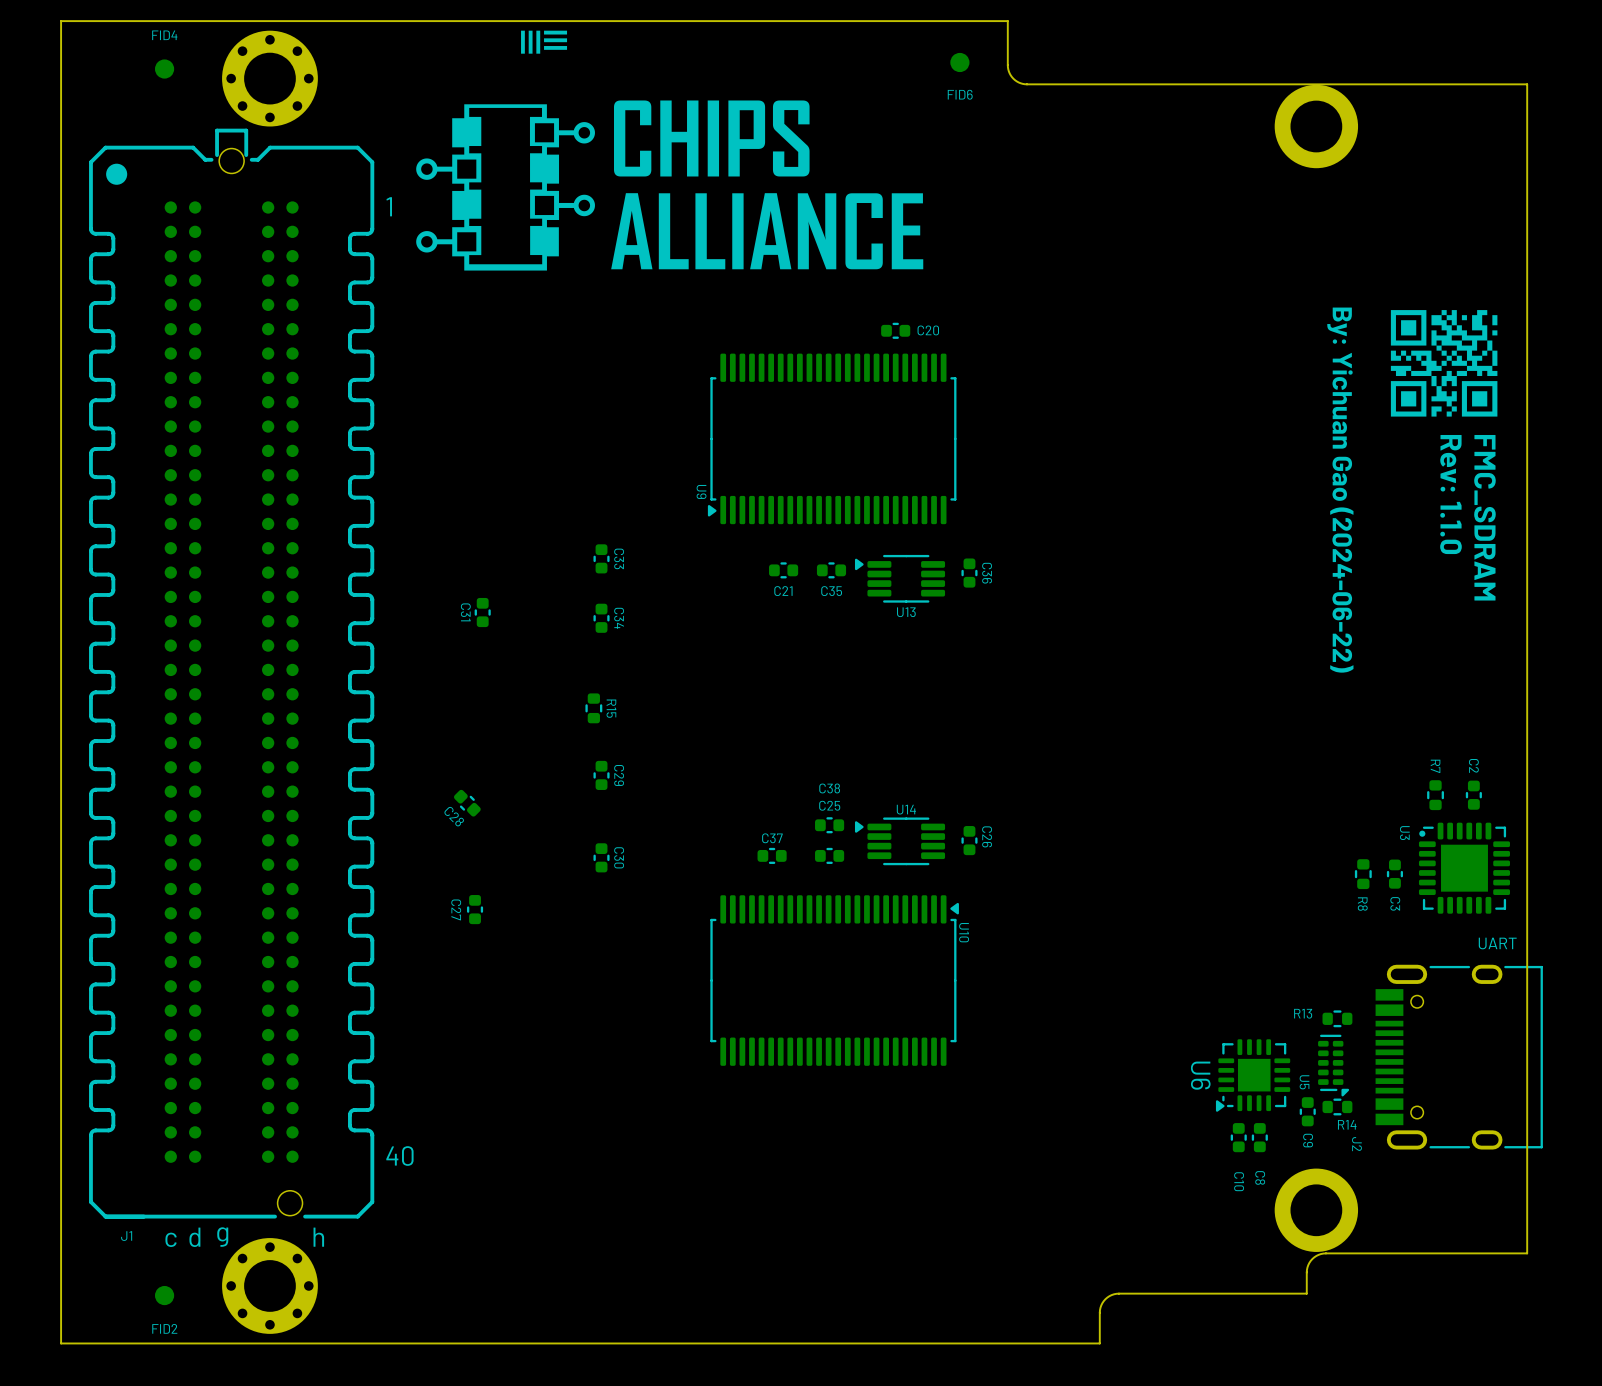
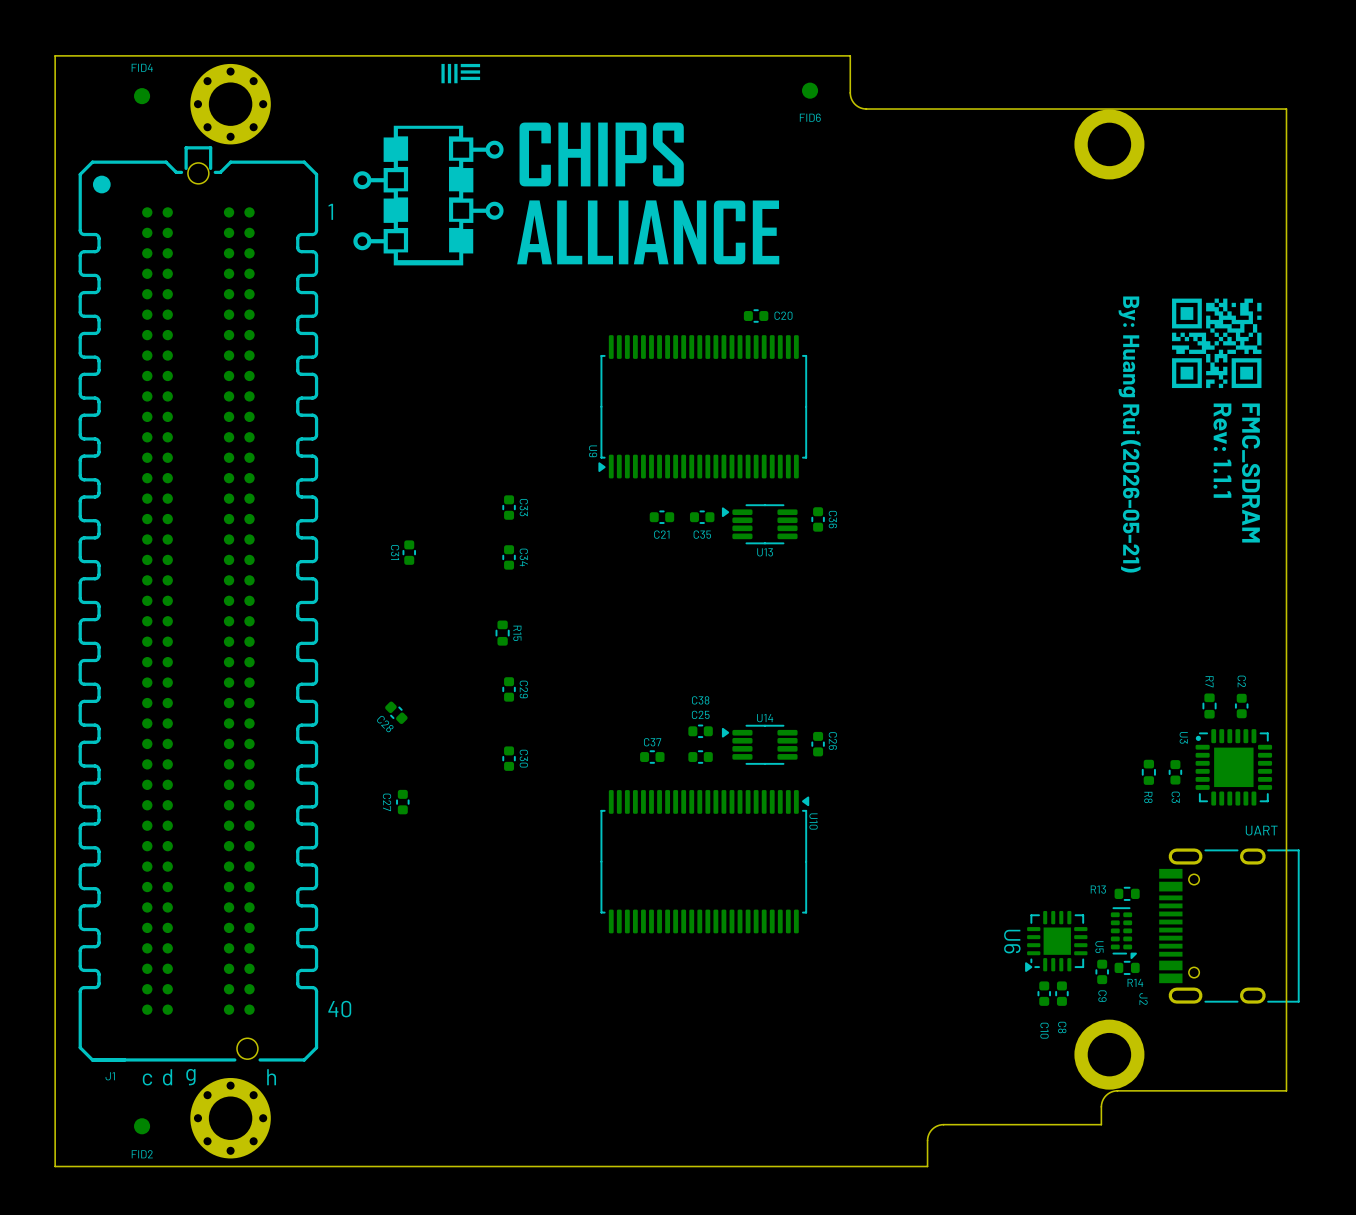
text: By: Yichuan Gao (2024-06-22) (1340, 490) -> By: Huang Rui (2026-05-21) (1129, 434)
text: Rev: 1.1.0 (1450, 494) -> Rev: 1.1.1 (1222, 450)

